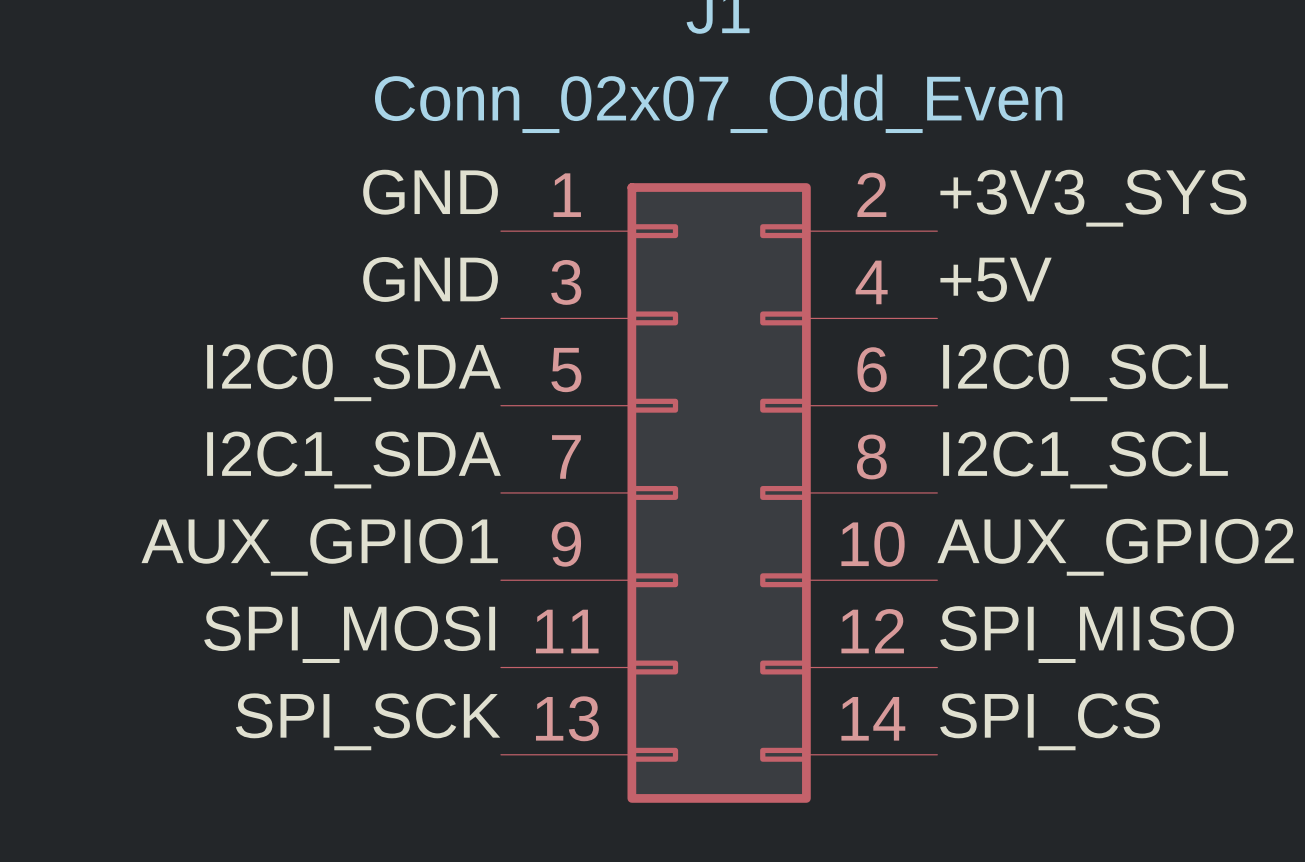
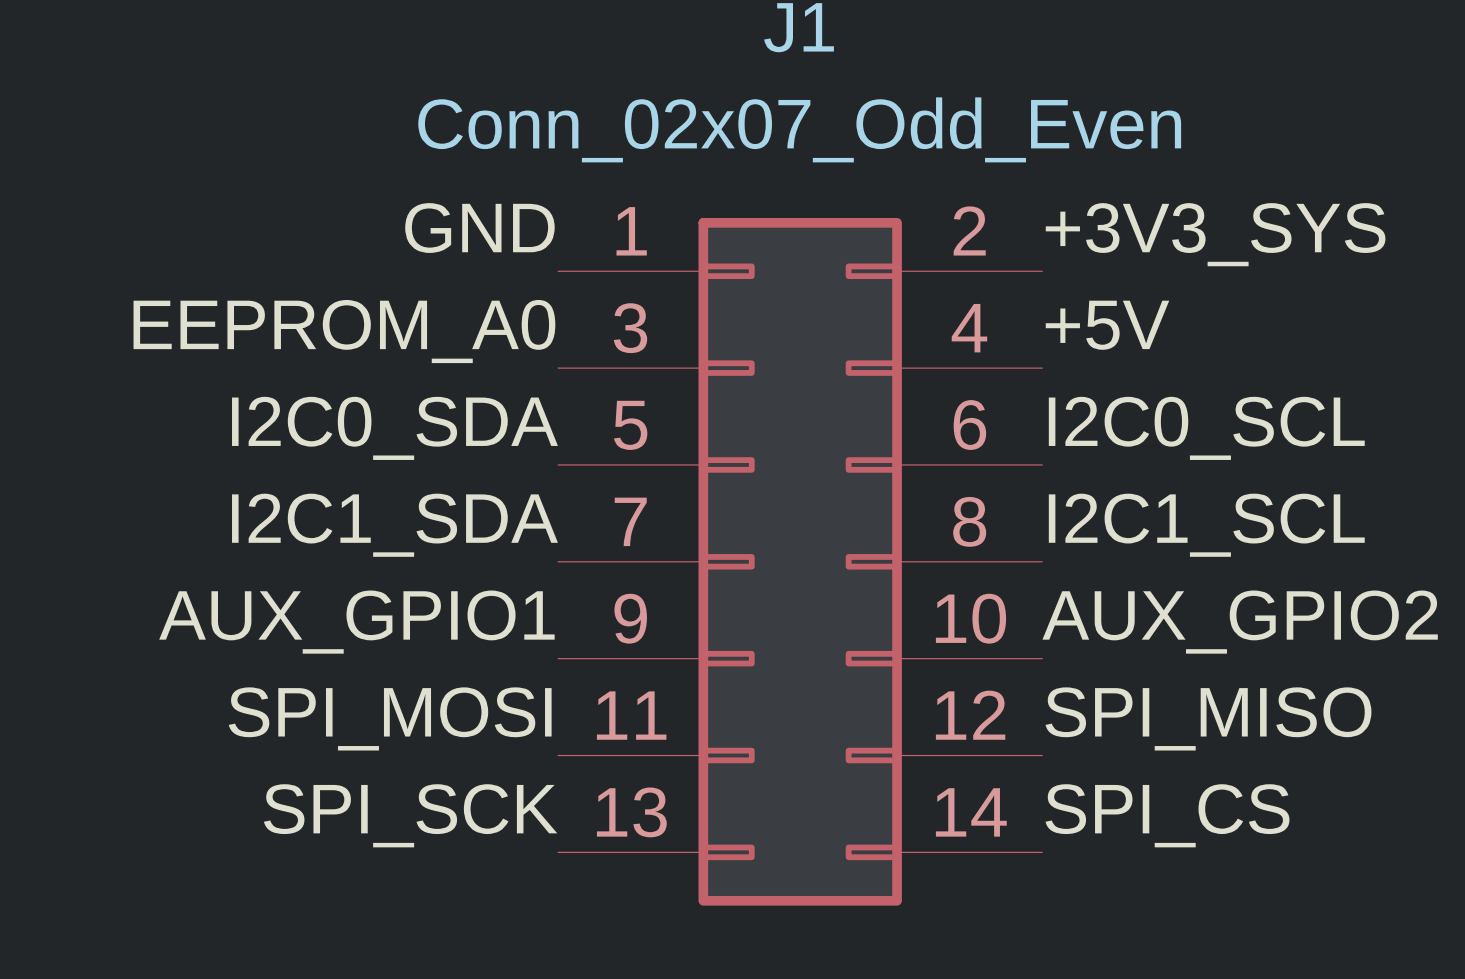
label: GND (430, 279) -> EEPROM_A0 (344, 331)

